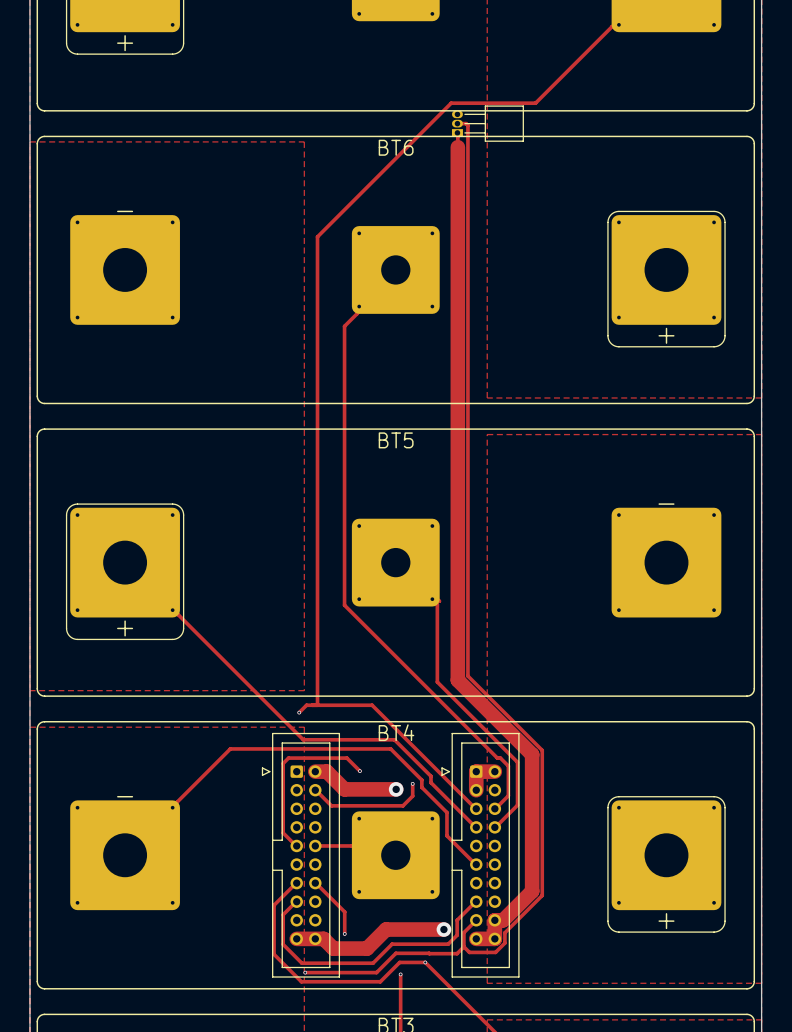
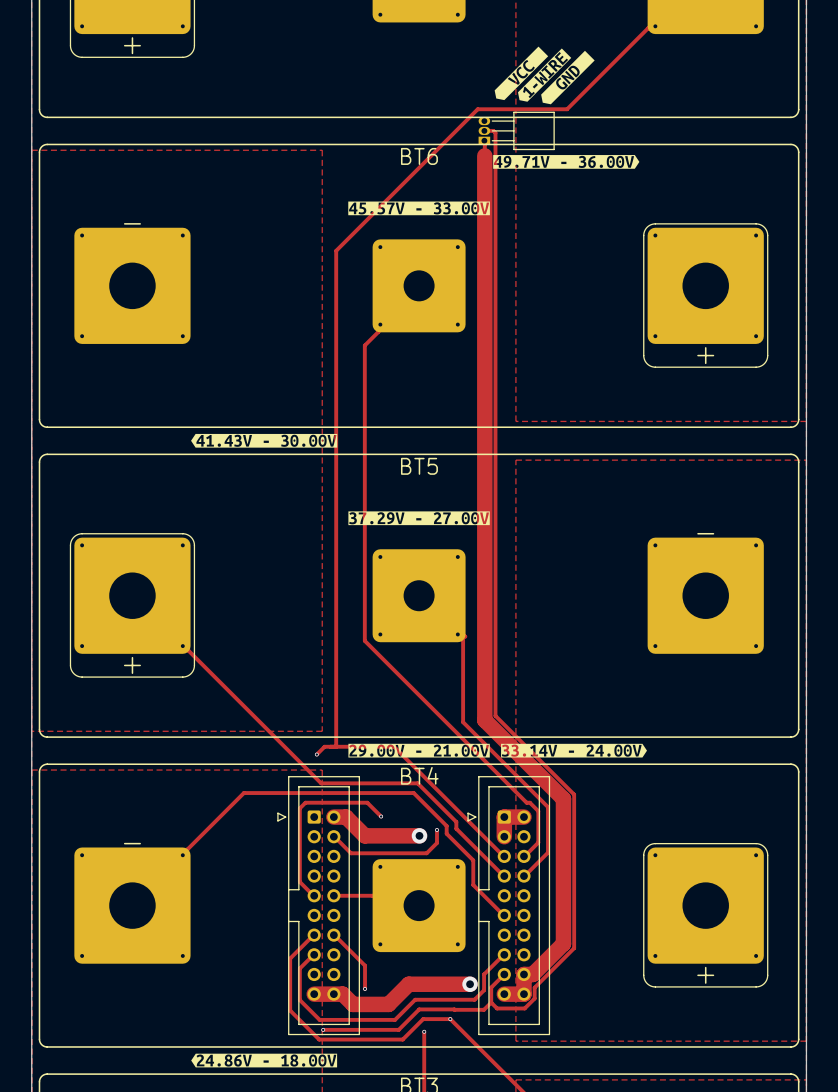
drawing: none -> [494, 46, 595, 105]
drawing: none -> [493, 155, 640, 169]
drawing: none -> [348, 201, 490, 216]
drawing: none -> [191, 433, 338, 448]
drawing: none -> [348, 511, 490, 526]
drawing: none -> [348, 743, 490, 758]
drawing: none -> [501, 743, 647, 758]
drawing: none -> [191, 1053, 338, 1068]

